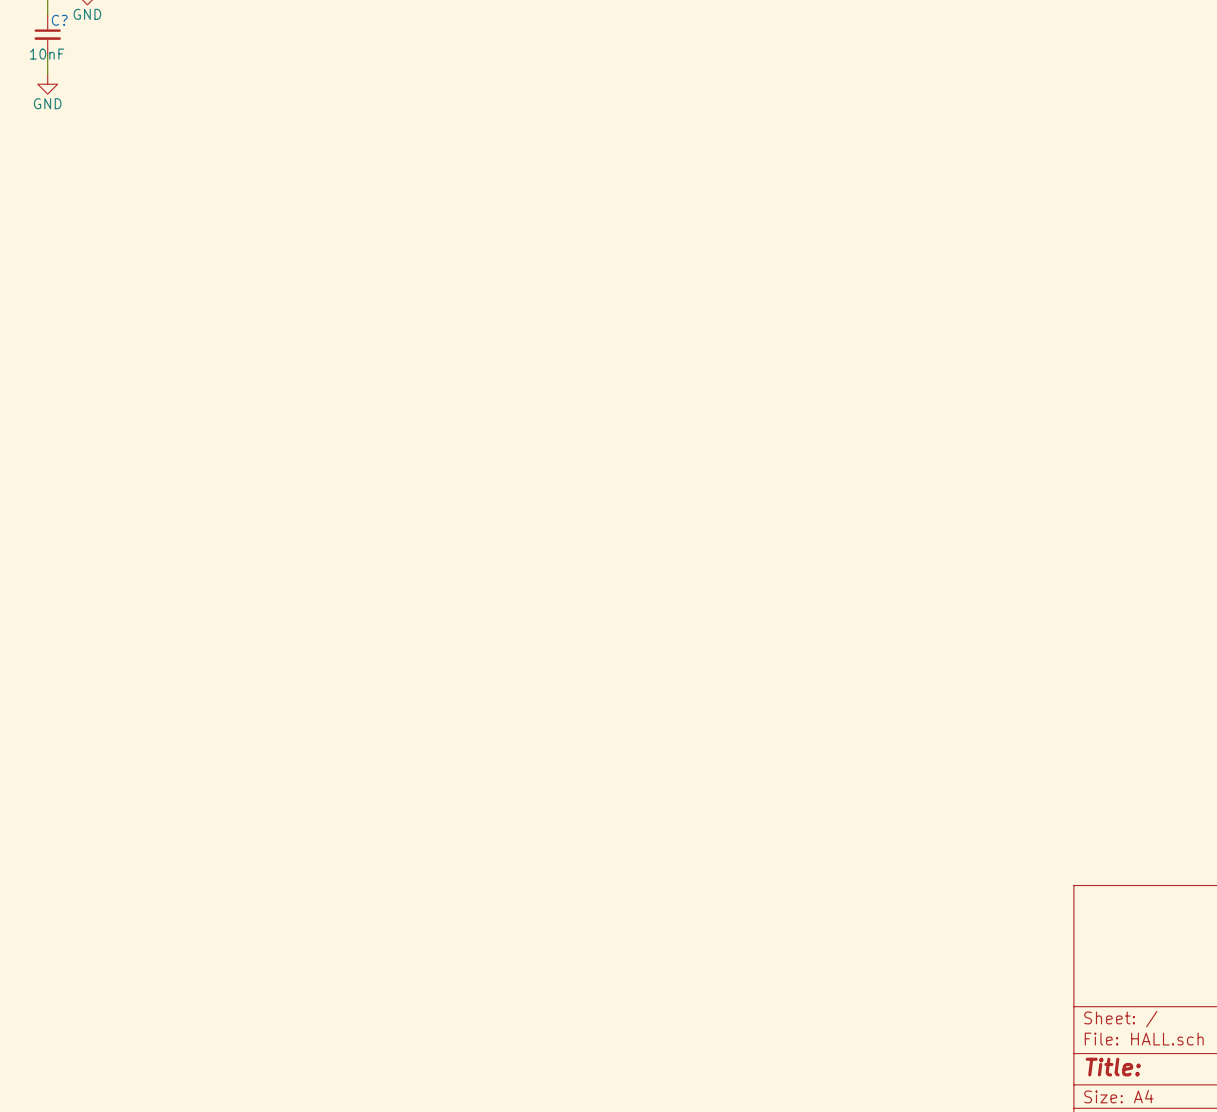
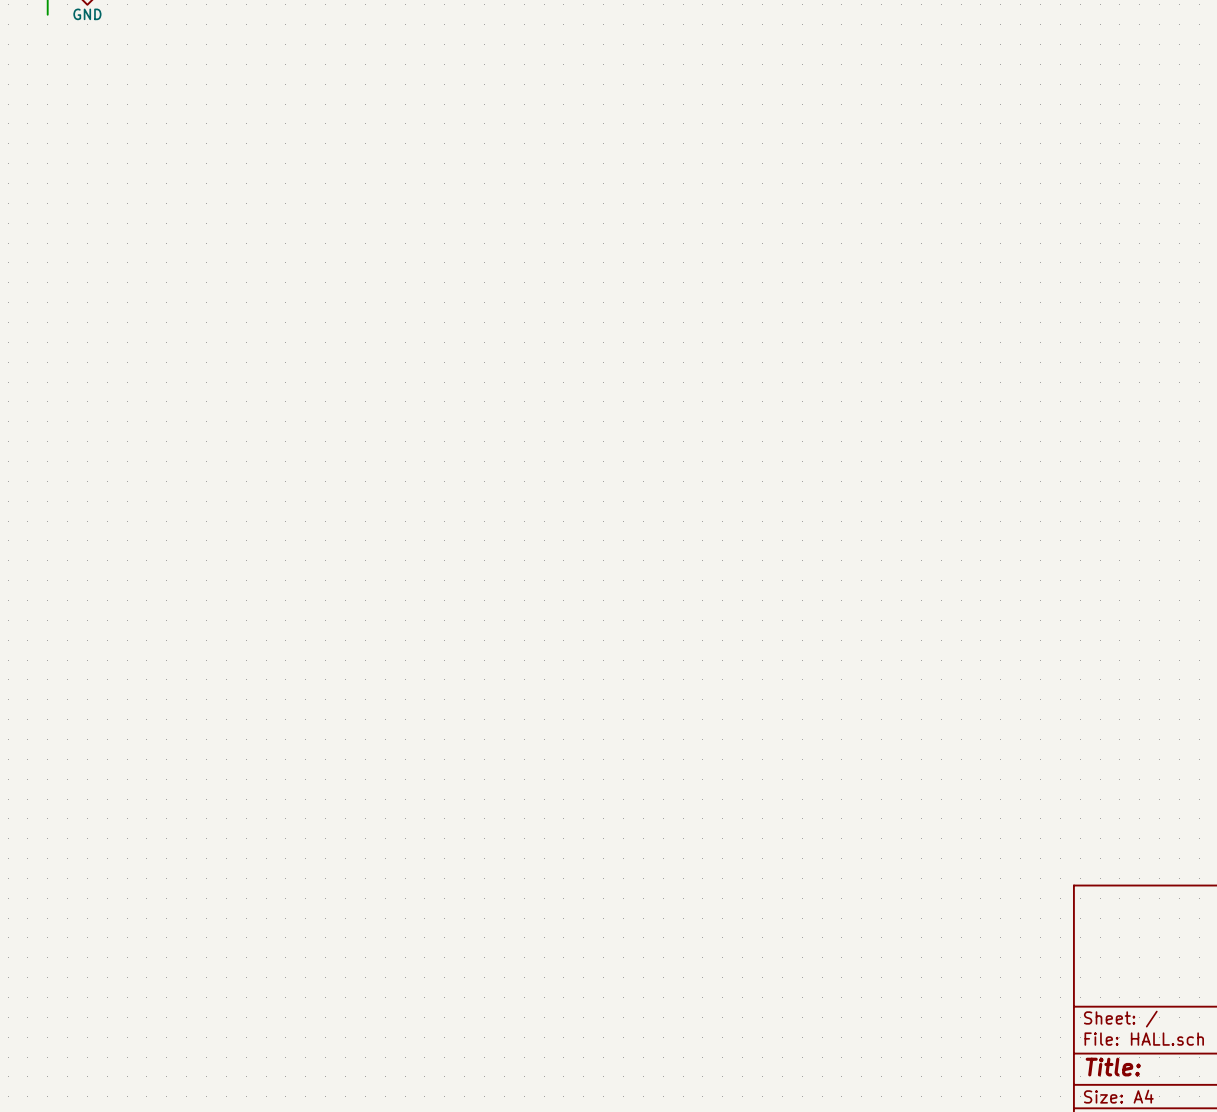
C?: 10nF (47, 34) -> none
wire: (47, 54) (47, 74) -> none
power symbol: GND (47, 84) -> none

